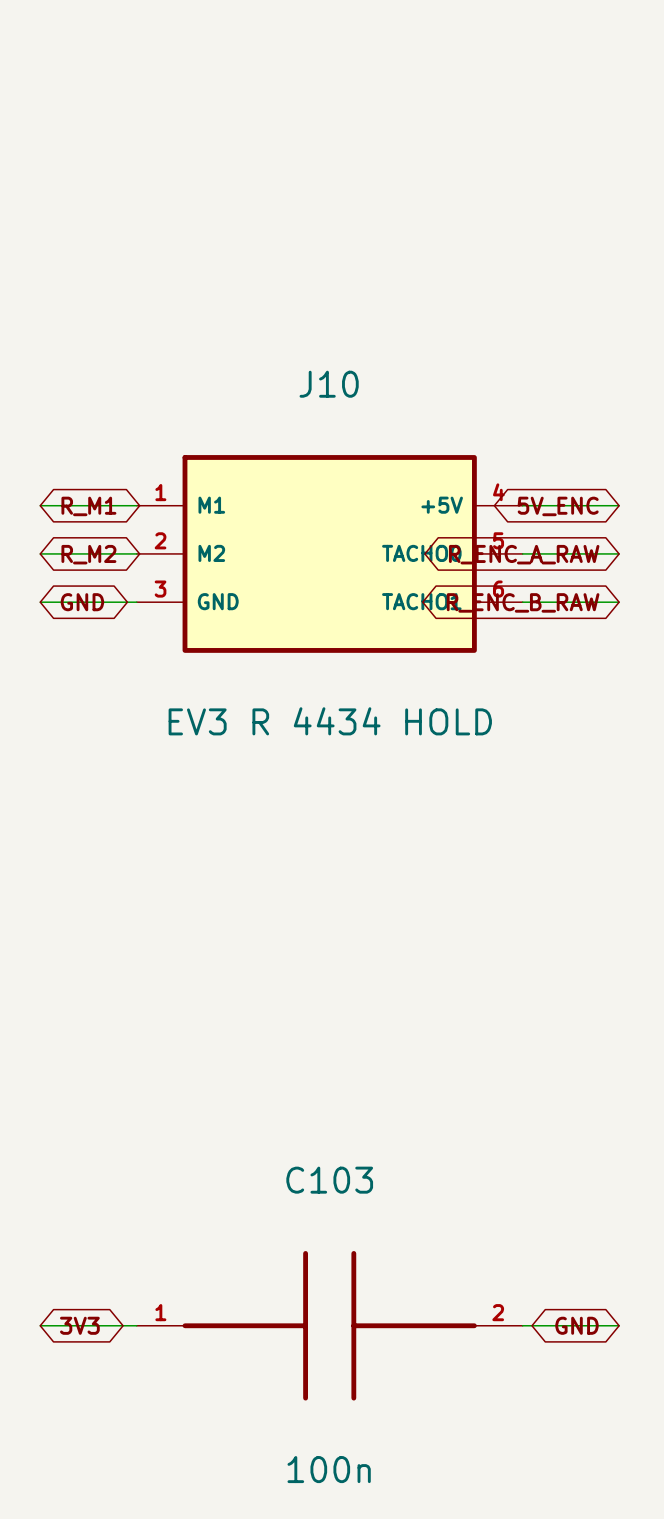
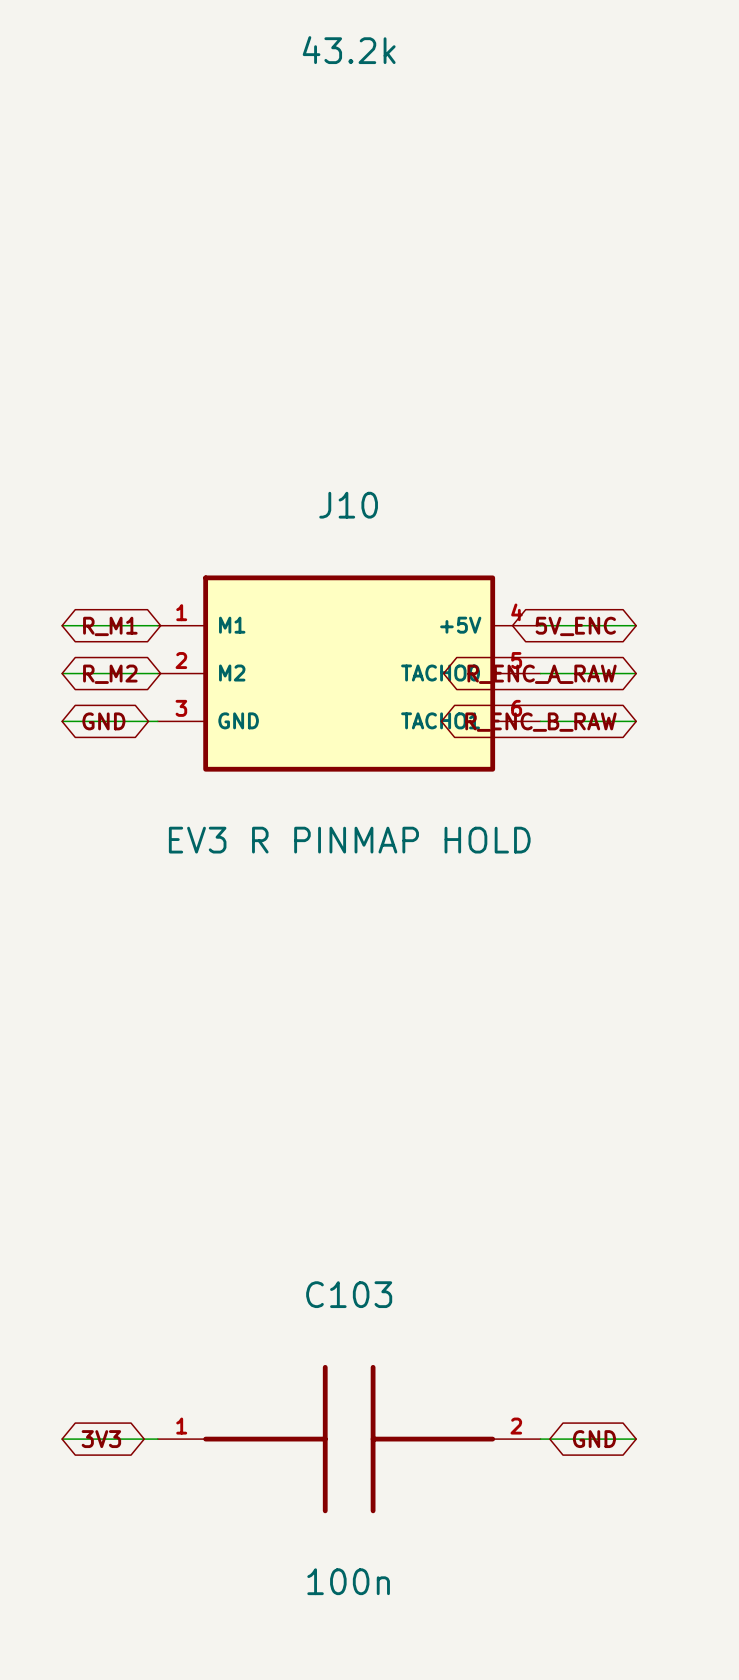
J10 value: EV3 R 4434 HOLD (330, 721) -> EV3 R PINMAP HOLD (349, 840)

